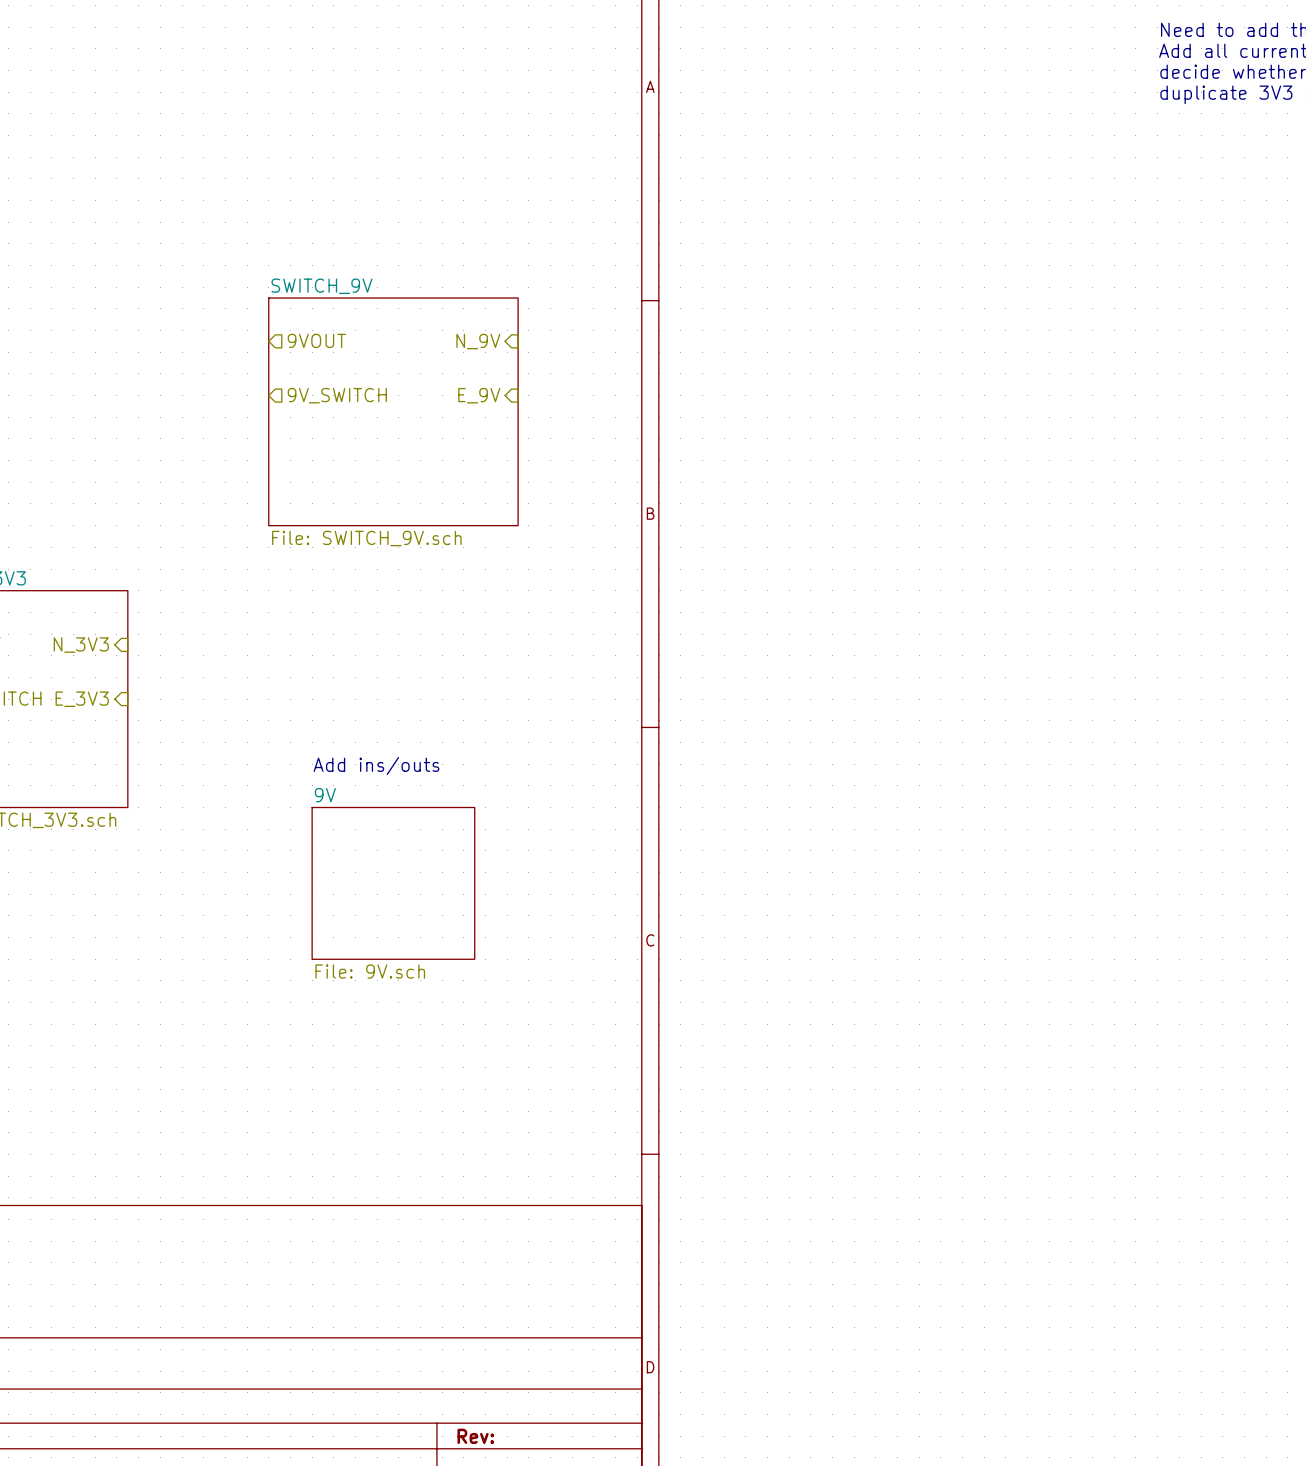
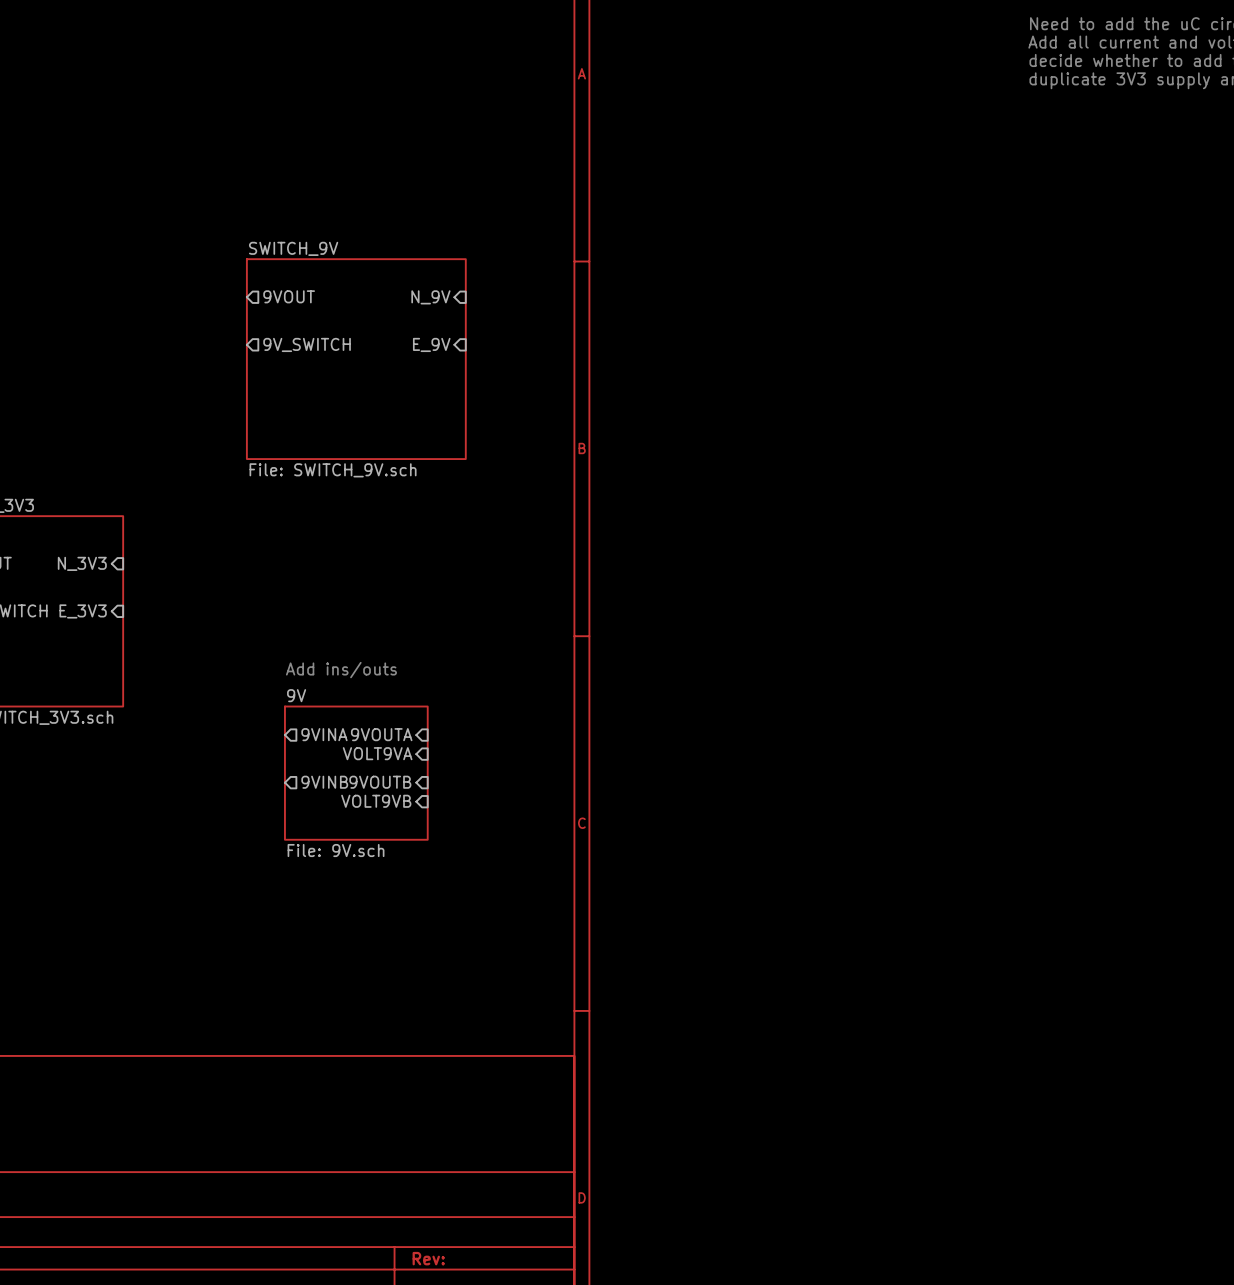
hierarchical label: none -> 9VINA (324, 734)
hierarchical label: none -> 9VOUTA (381, 734)
hierarchical label: none -> VOLT9VA (377, 753)
hierarchical label: none -> 9VINB (324, 782)
hierarchical label: none -> 9VOUTB (380, 782)
hierarchical label: none -> VOLT9VB (376, 801)

